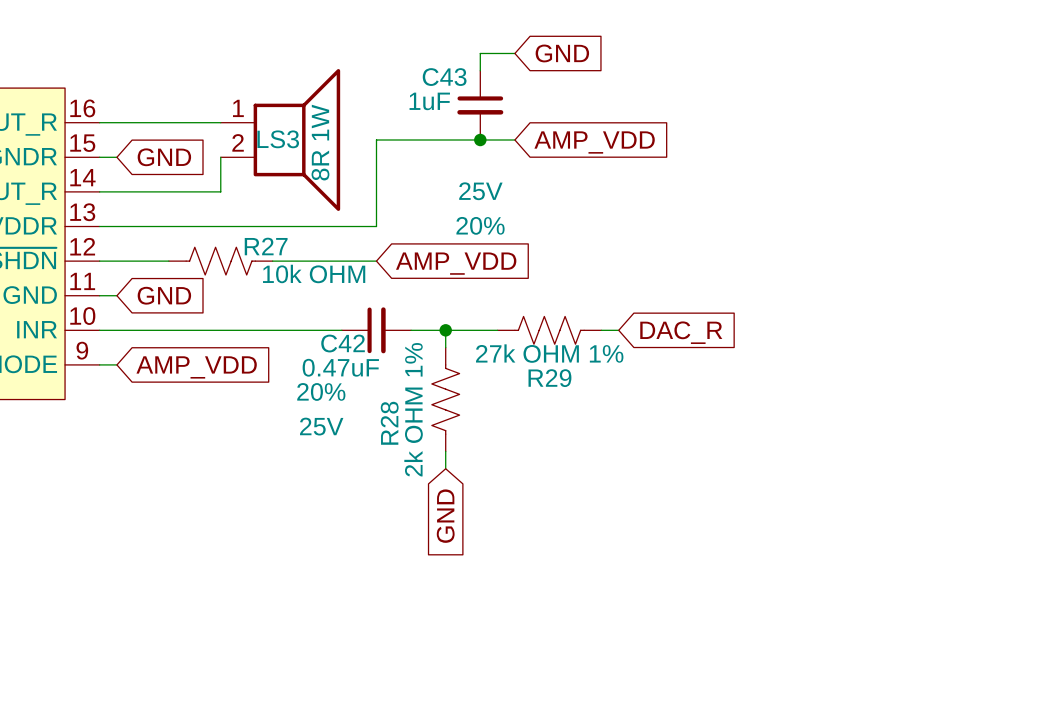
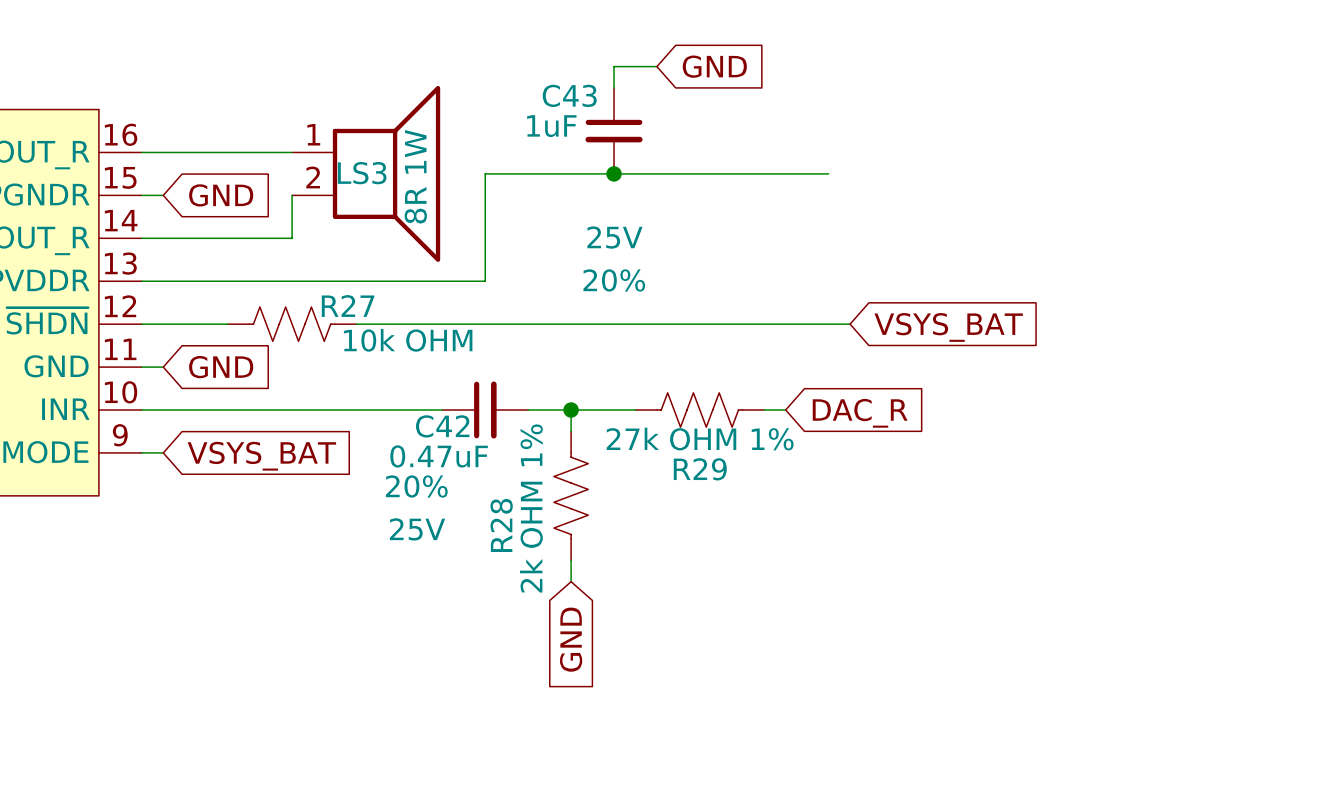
wire: none -> (656, 173) (828, 173)
global label: AMP_VDD (594, 142) -> none
wire: none -> (485, 324) (850, 324)
global label: AMP_VDD (456, 263) -> none
global label: none -> VSYS_BAT (948, 327)
global label: AMP_VDD (196, 367) -> VSYS_BAT (261, 456)

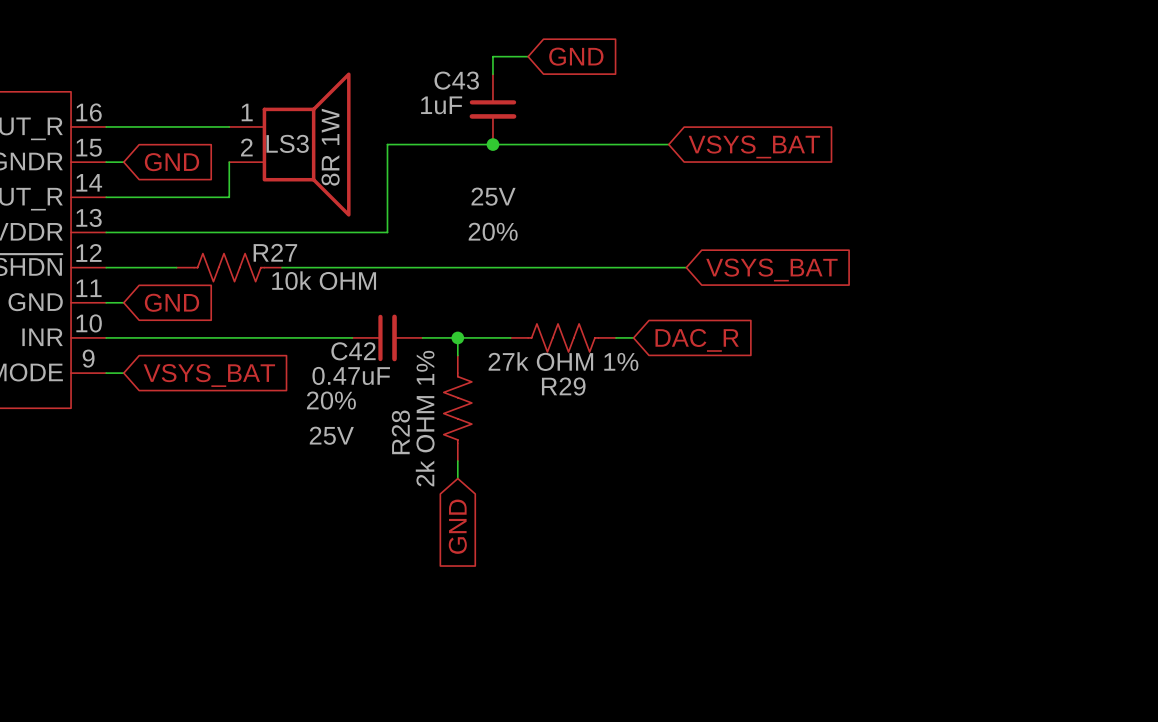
global label: none -> VSYS_BAT (754, 146)

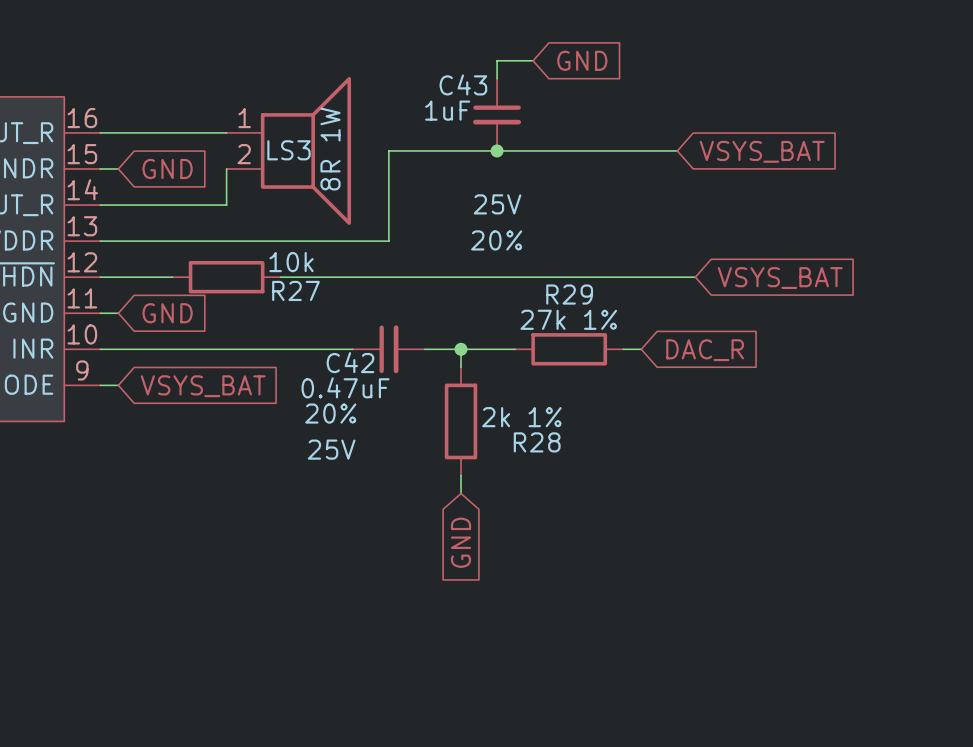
R27 name position: R27 (275, 252) -> R27 (295, 290)
R27 symbol: [176, 253, 283, 282] -> [172, 260, 281, 294]
R27 value: 10k OHM (324, 280) -> 10k (291, 262)
R29 symbol: [510, 323, 617, 353] -> [515, 333, 624, 366]
R28 symbol: [443, 355, 472, 462] -> [444, 367, 478, 476]
R29 value: 27k OHM 1% (563, 361) -> 27k 1% (568, 319)
R29 name position: R29 (563, 386) -> R29 (569, 294)
R28 value: 2k OHM 1% (425, 418) -> 2k 1% (521, 417)
R28 name position: R28 (400, 432) -> R28 (537, 442)

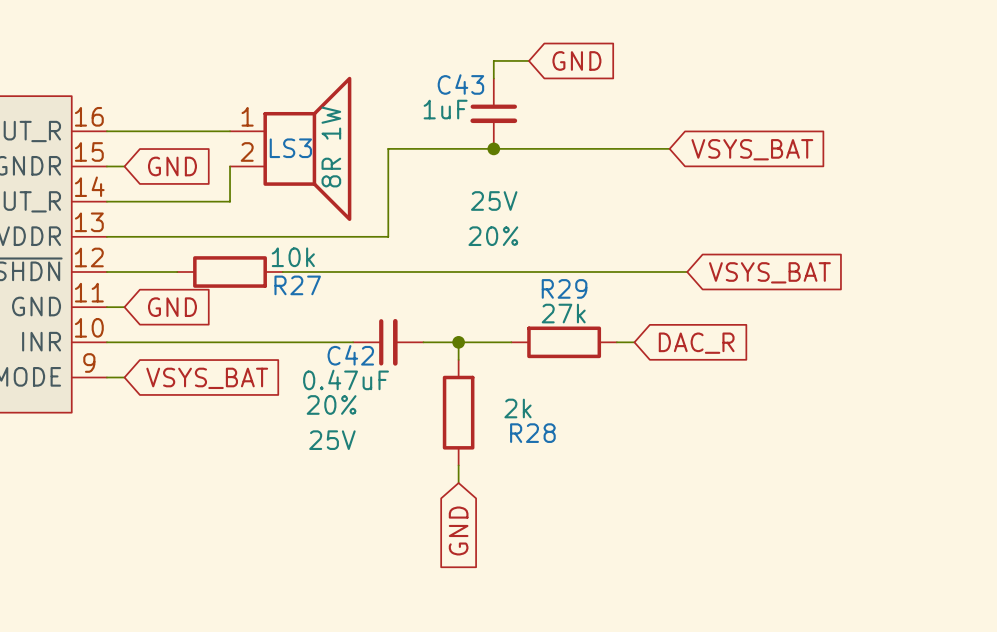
R29 value: 27k 1% (568, 319) -> 27k (563, 313)
R28 value: 2k 1% (521, 417) -> 2k (517, 408)

